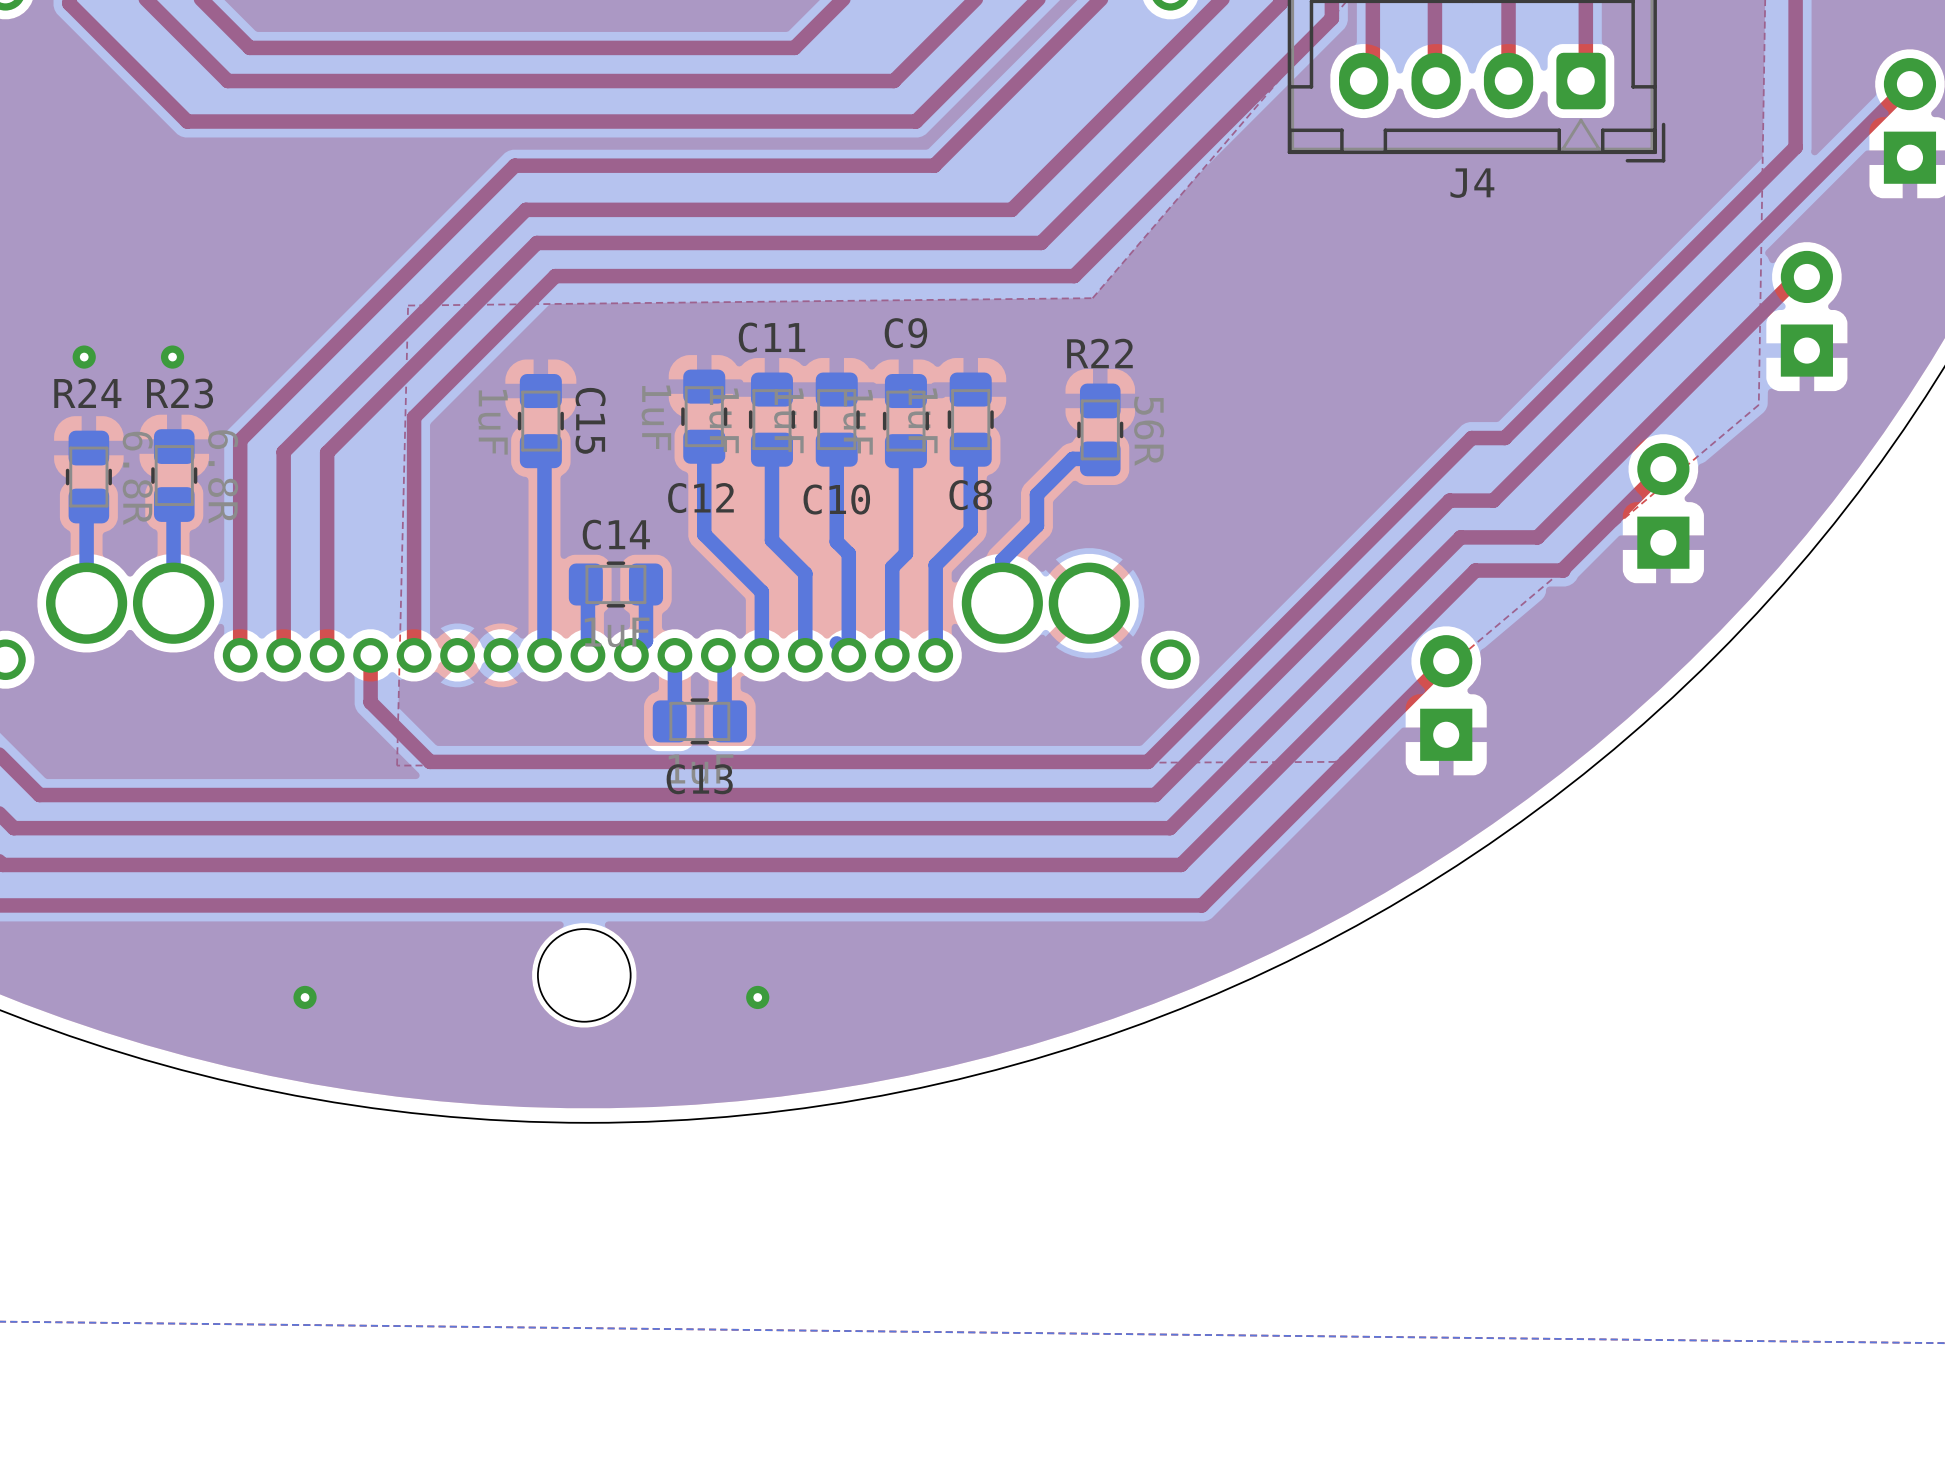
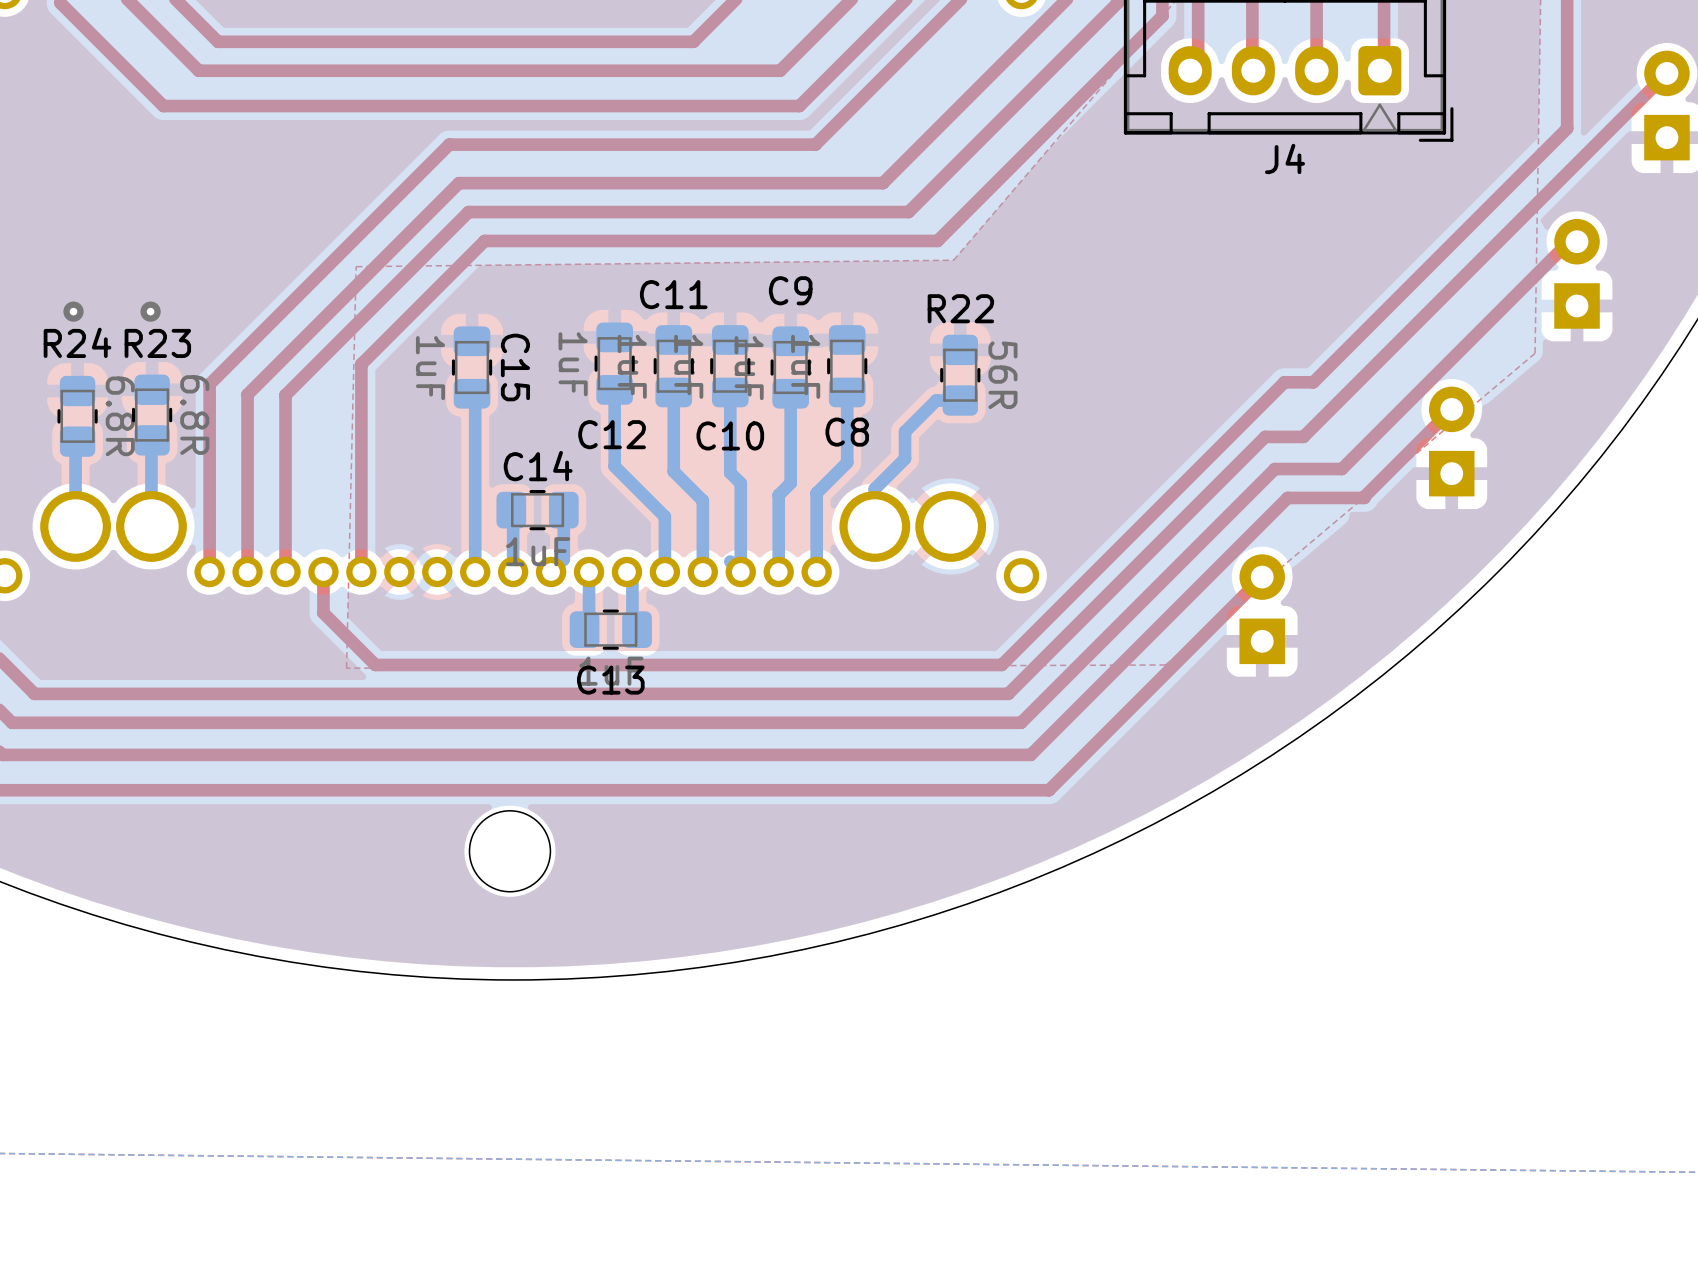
via: (305, 997) -> none
via: (757, 997) -> none

